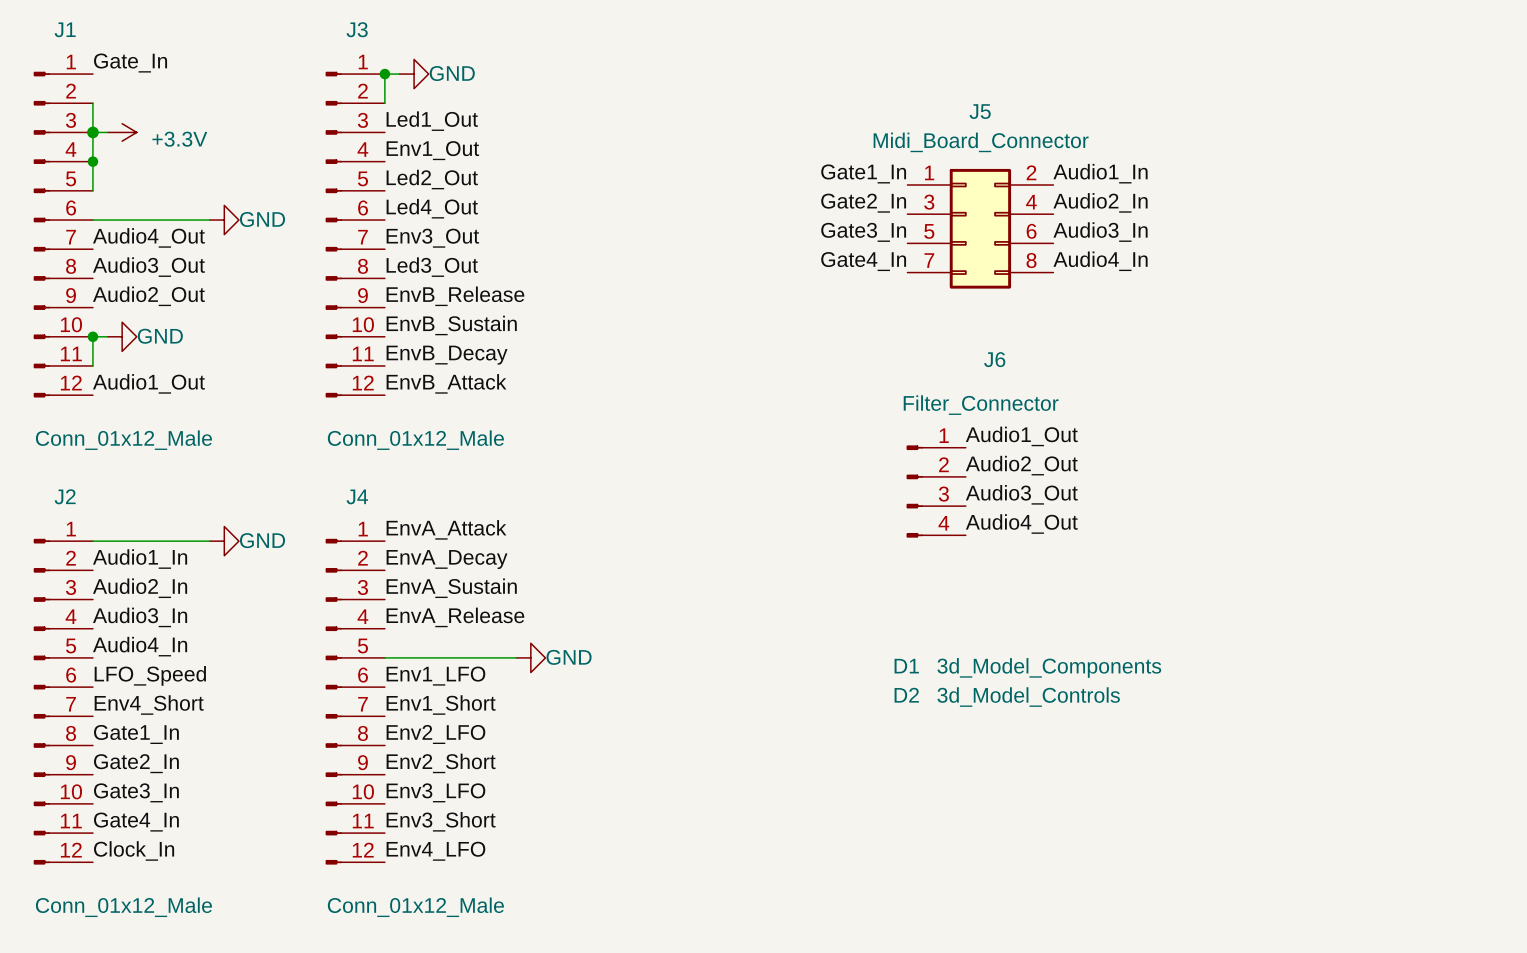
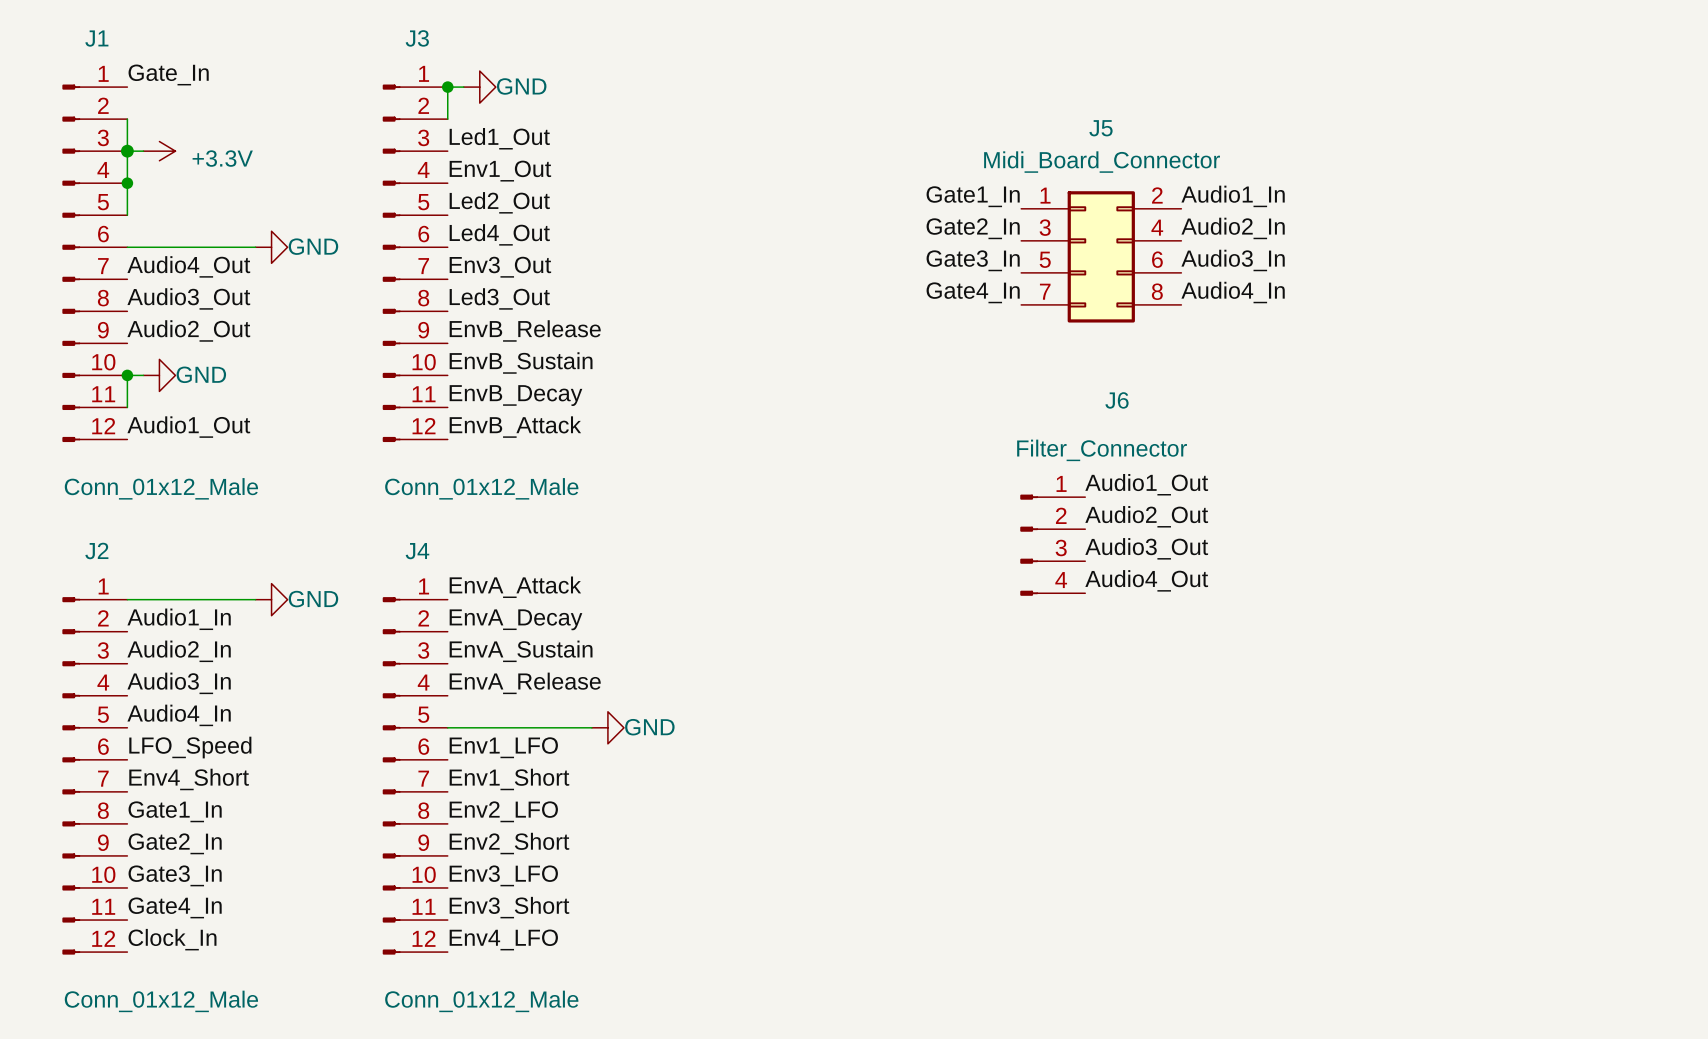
D1: 3d_Model_Components (1027, 667) -> none
D2: 3d_Model_Controls (1007, 697) -> none

